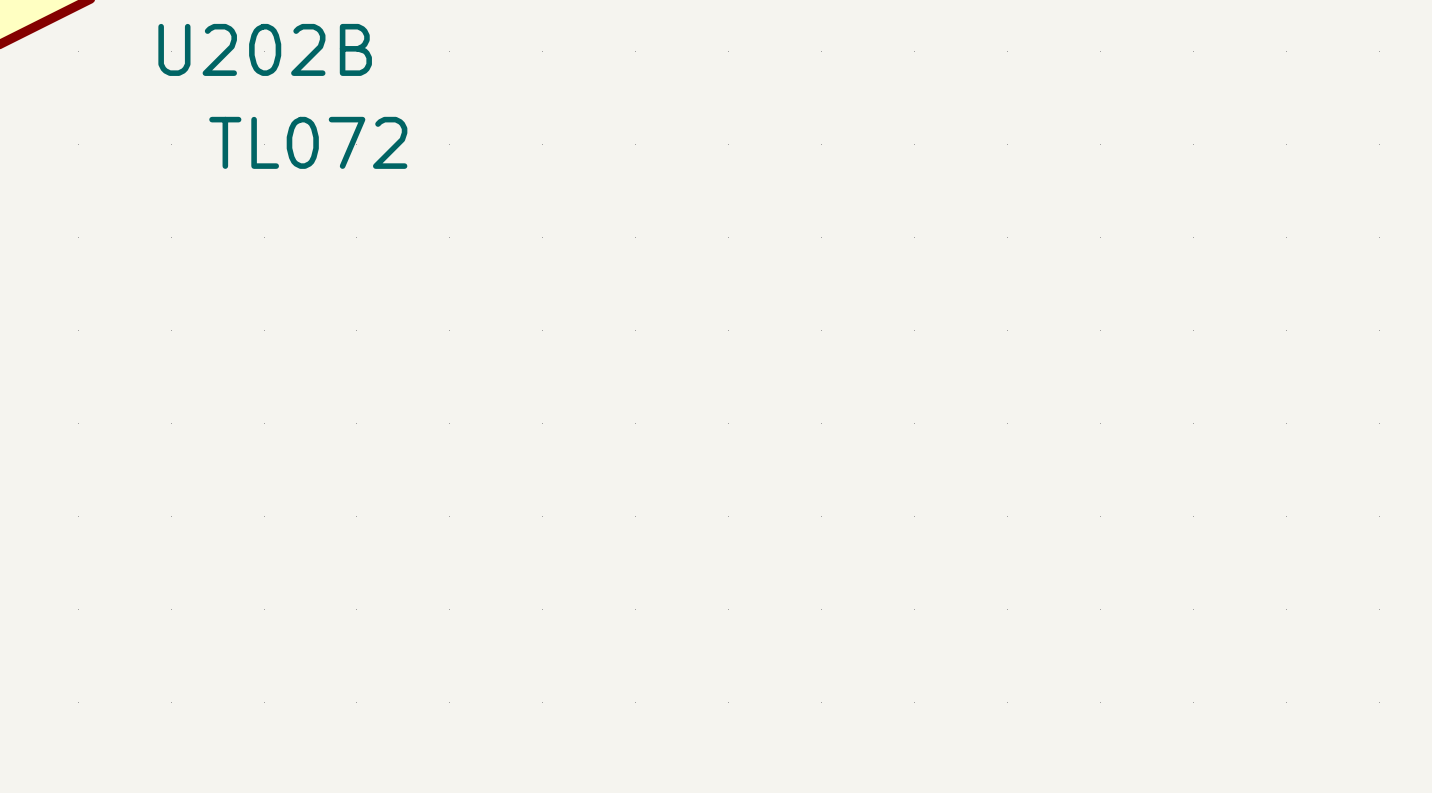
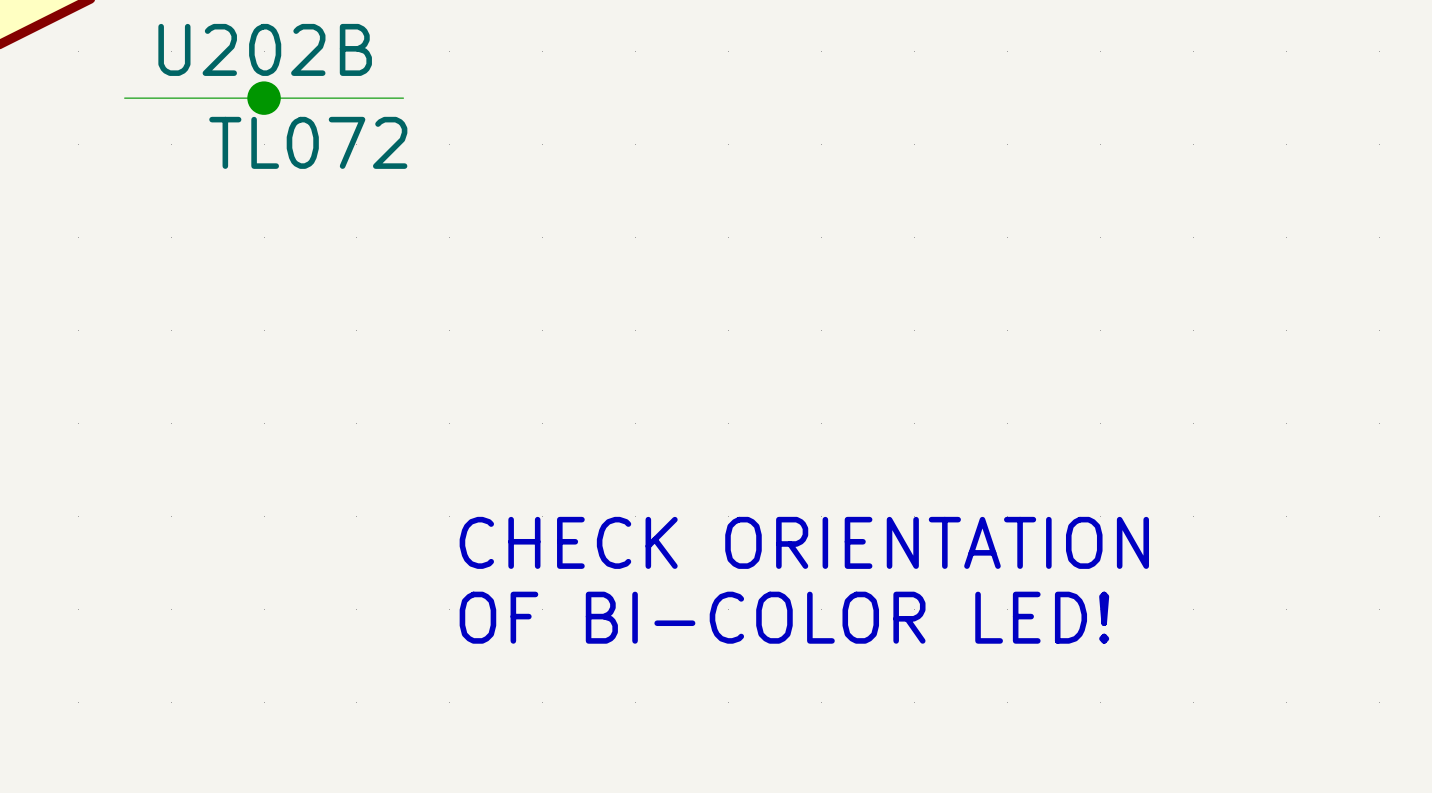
wire: none -> (124, 98) (403, 98)
junction: none -> (264, 98)
text: none -> CHECK ORIENTATION (804, 542)
text: none -> OF BI-COLOR LED! (784, 617)

